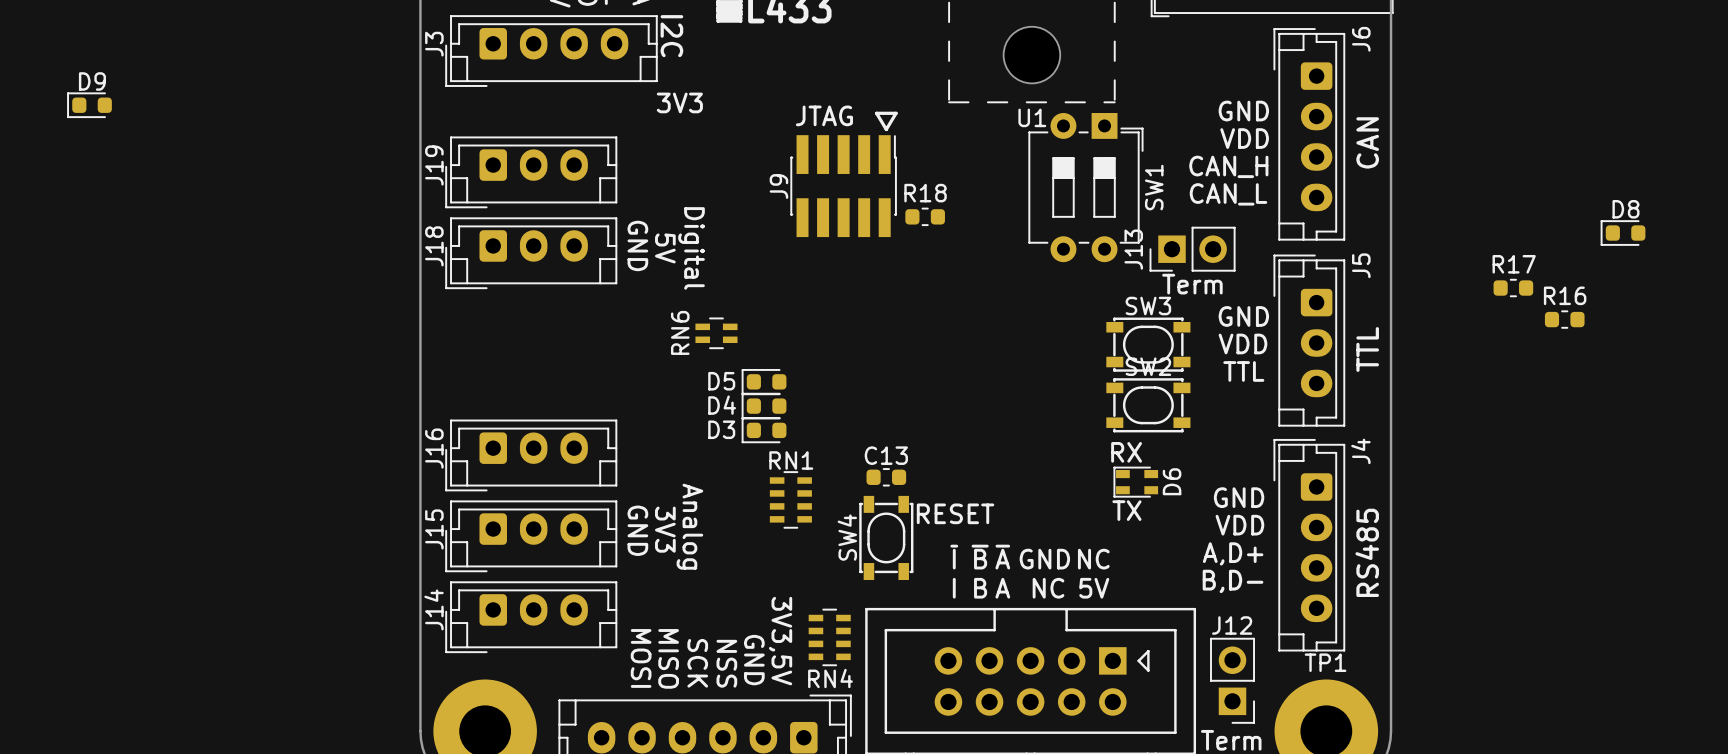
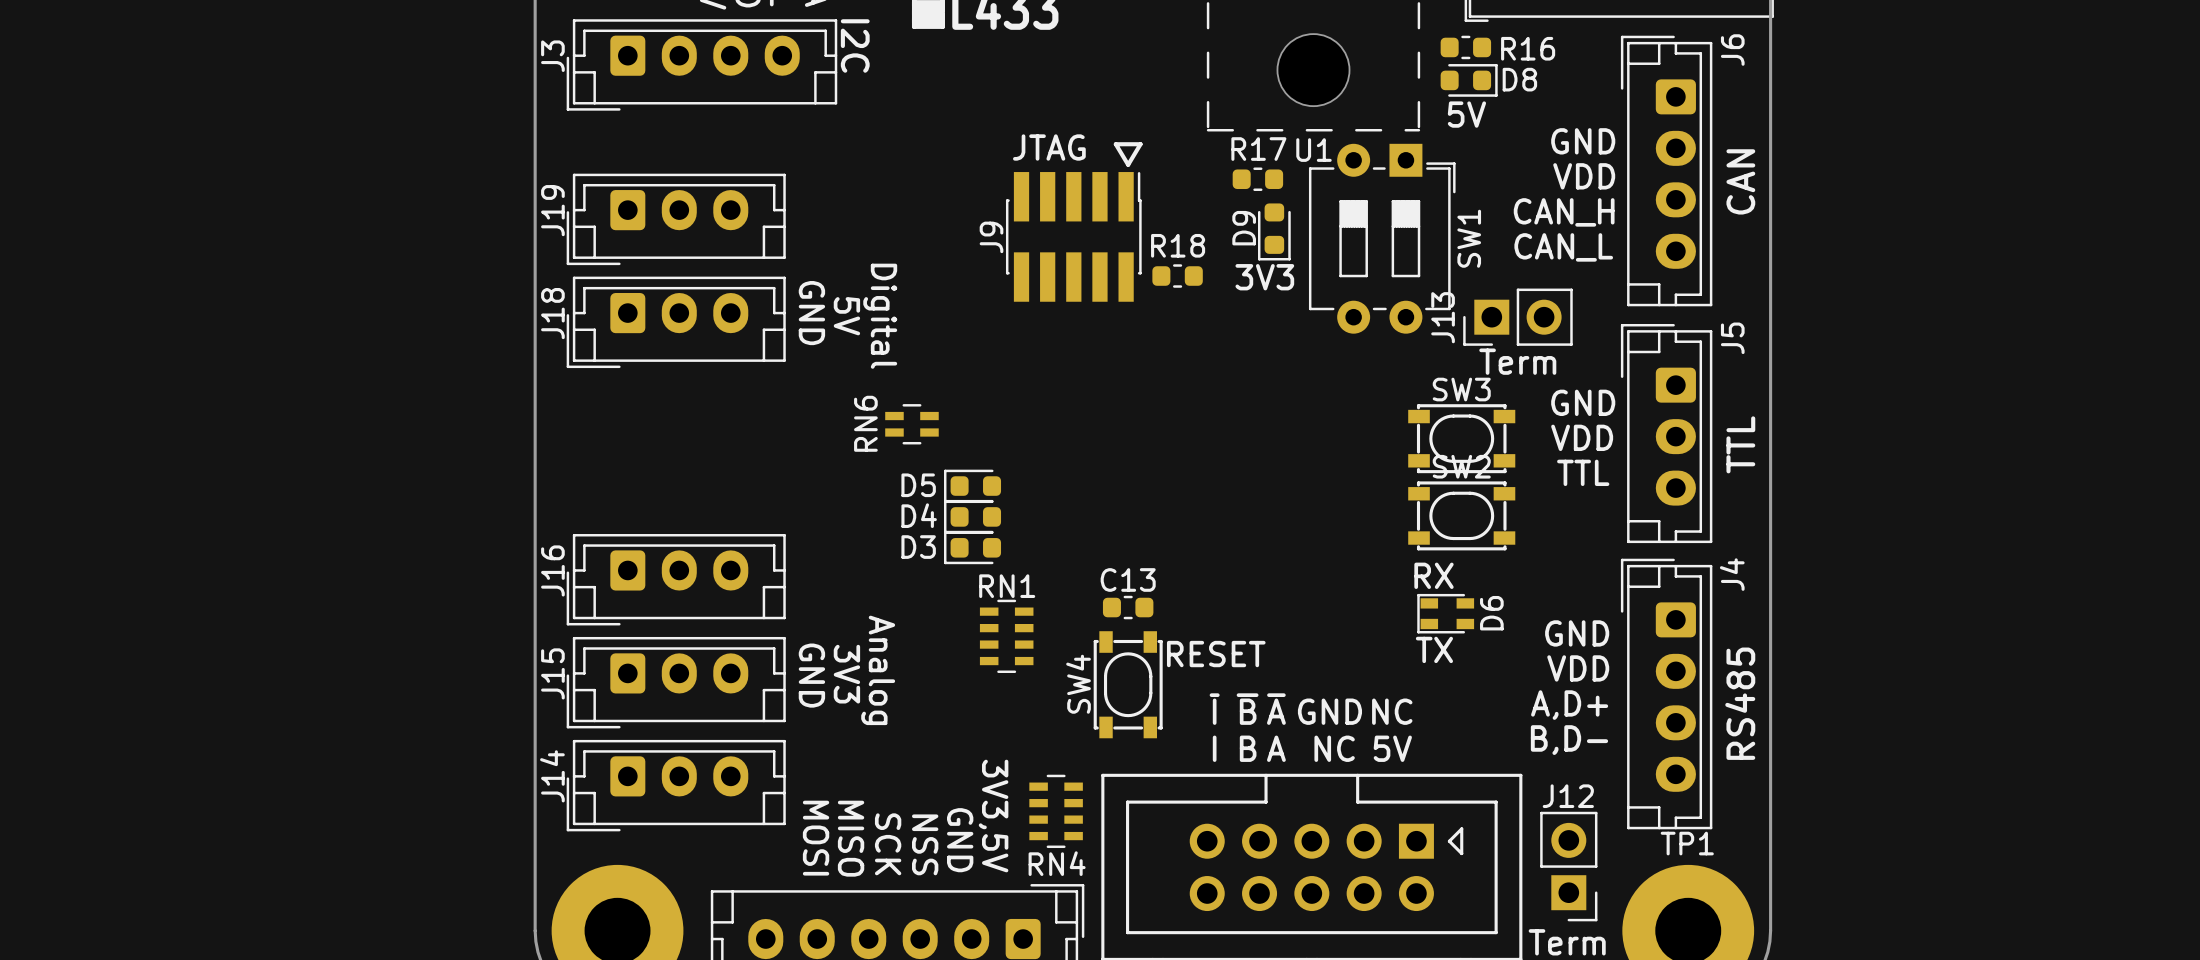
text: none -> 5V (1466, 114)
text position: 3V3 (679, 102) -> 3V3 (1264, 277)
D9 rotation: 0° (89, 105) -> 90° counterclockwise (1274, 231)
D9 position: (89, 105) -> (1274, 231)
D8 name position: D8 (1625, 209) -> D8 (1519, 79)
D8 rotation: 0° (1623, 233) -> 180° (1469, 80)
D8 position: (1623, 233) -> (1469, 80)
R17 position: (1513, 288) -> (1257, 179)
R16 name position: R16 (1565, 295) -> R16 (1528, 48)
R16 position: (1564, 319) -> (1465, 47)

